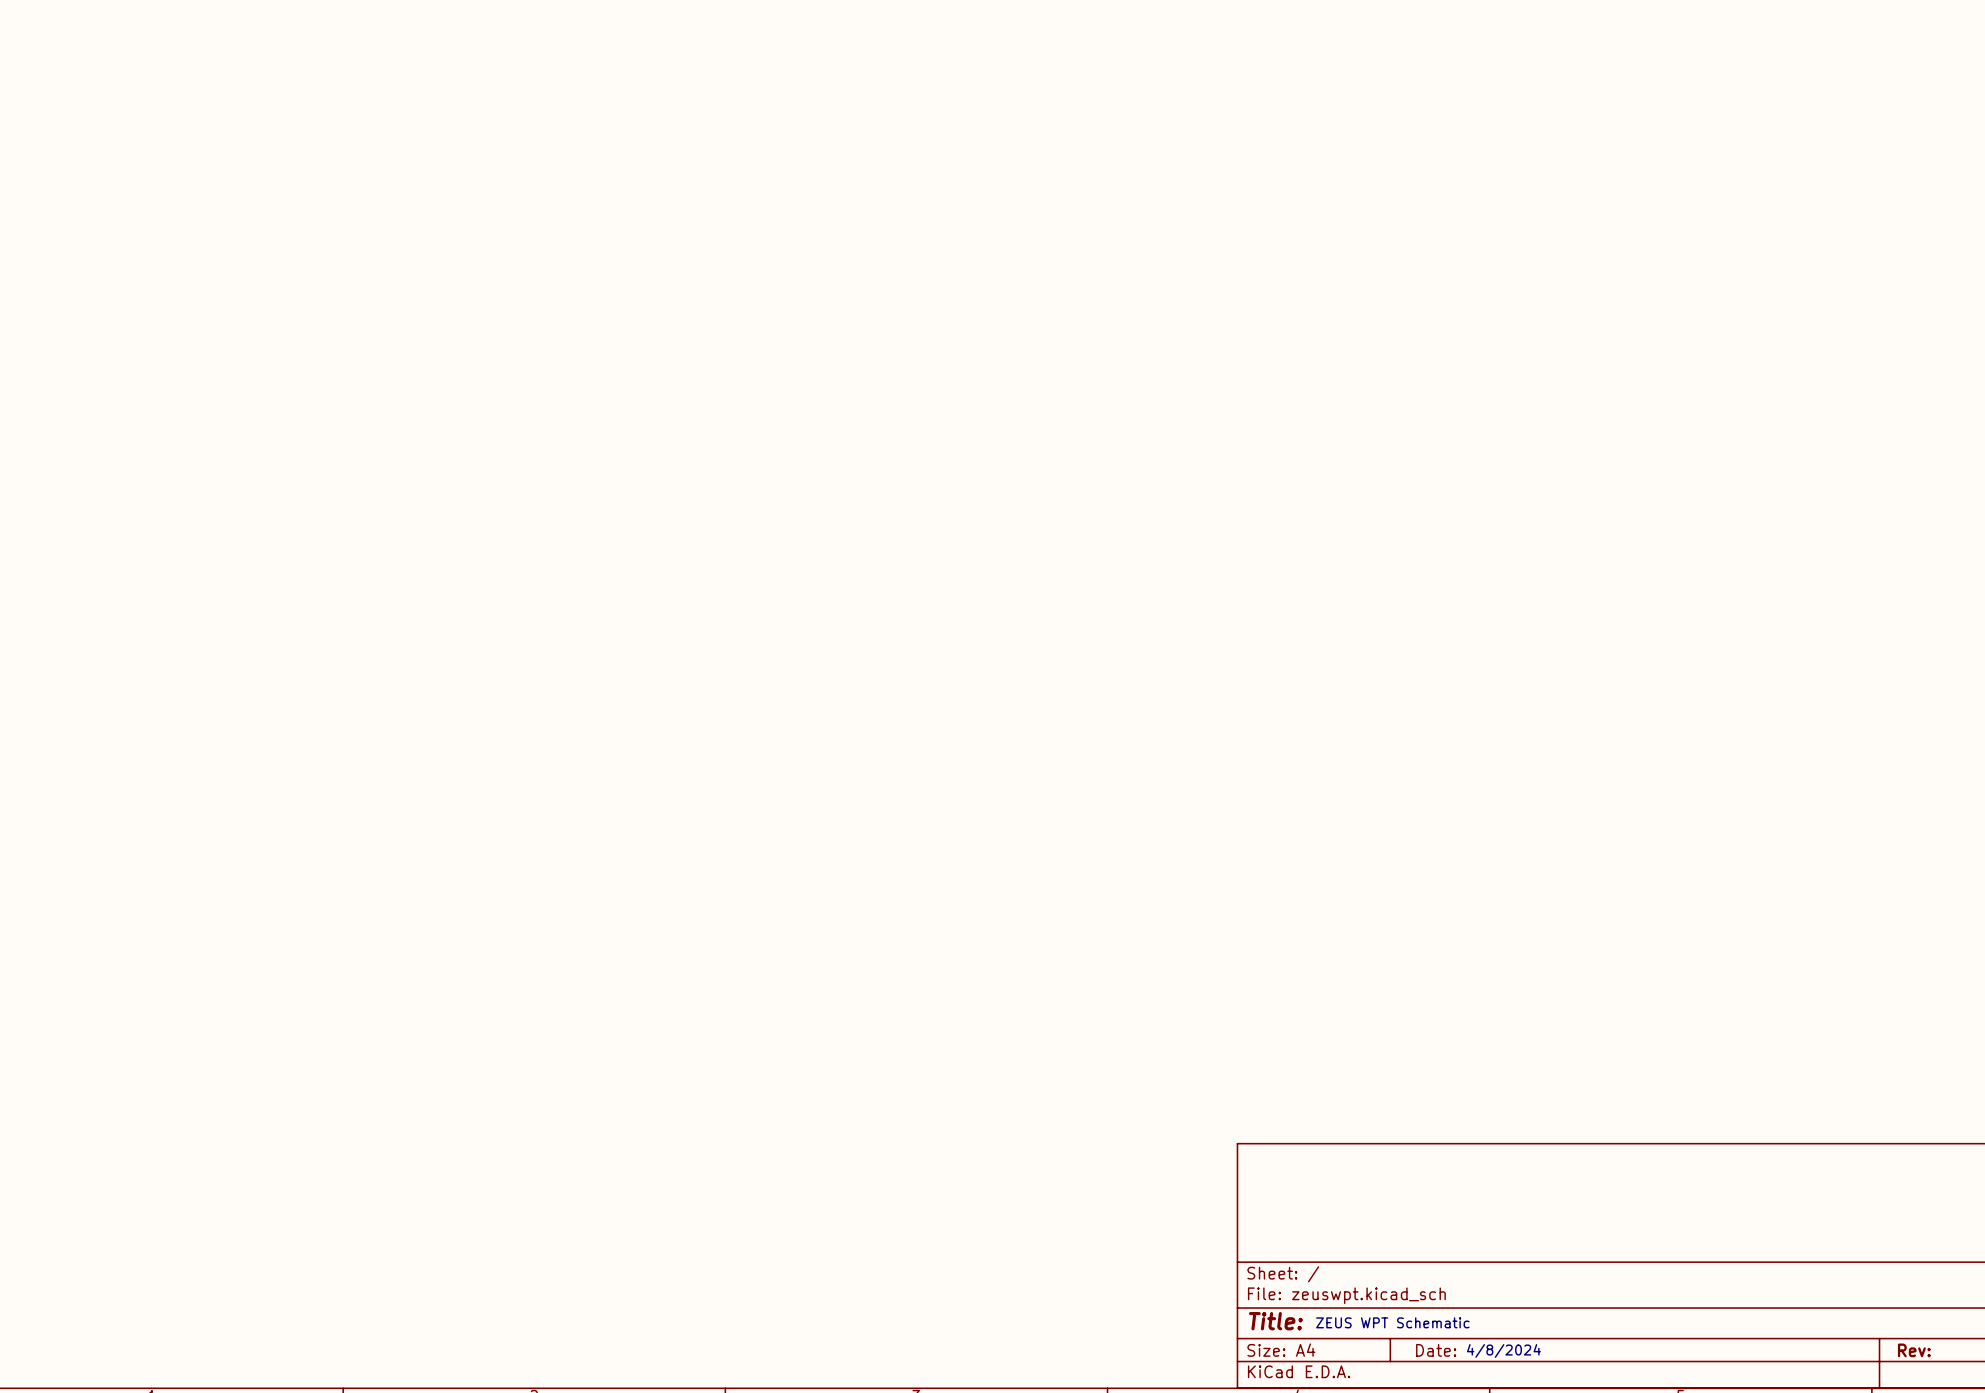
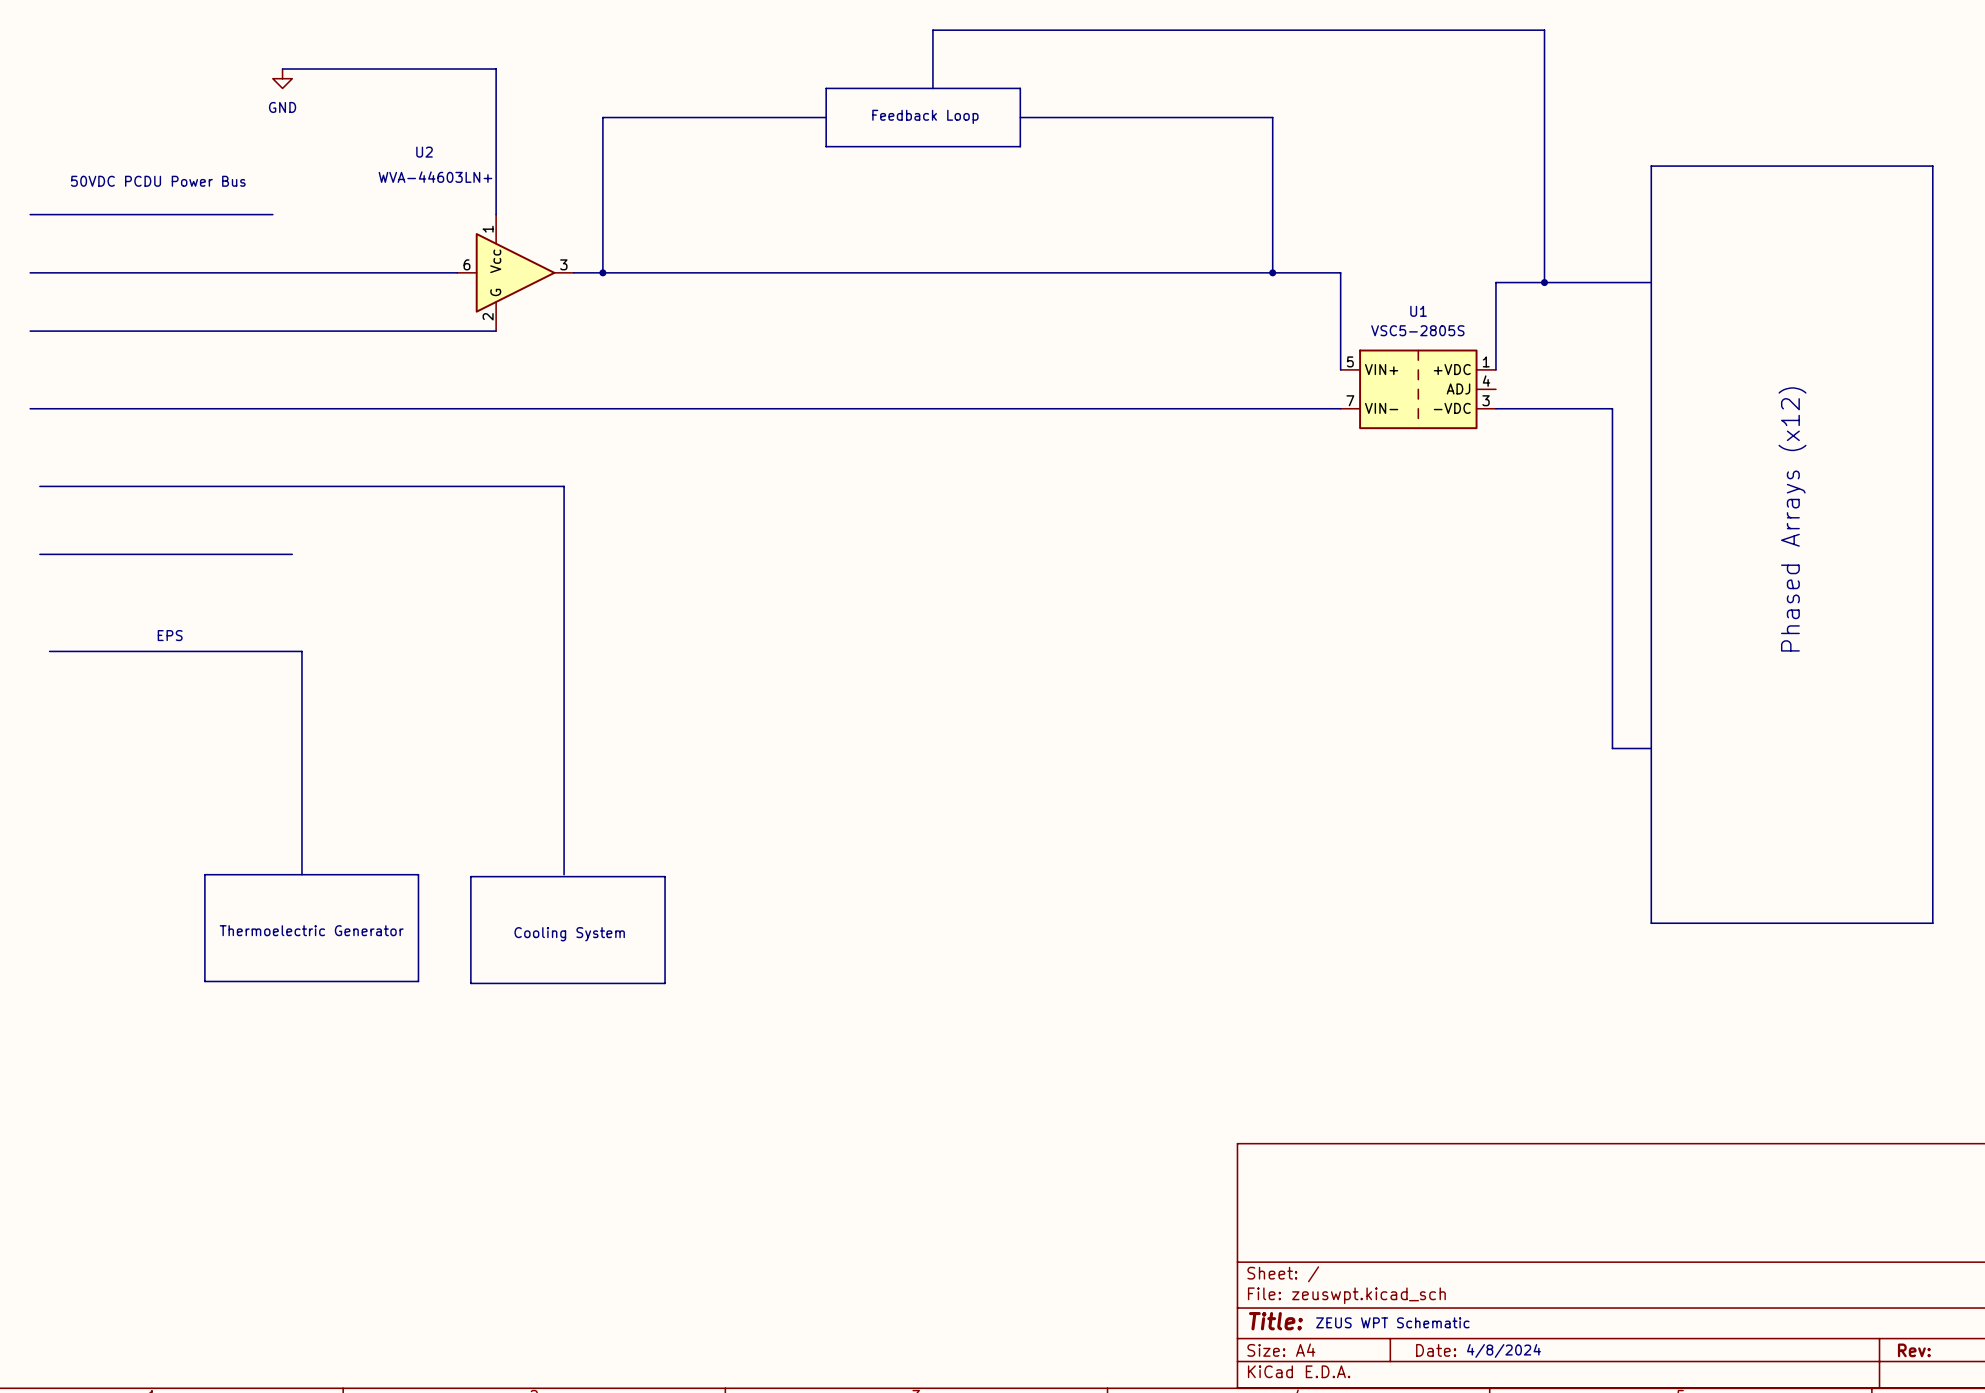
wire: none -> (282, 69) (496, 69) (496, 214)
power symbol: none -> GND (282, 78)
line: none -> (826, 88) (1020, 88) (1020, 146) (826, 146) (826, 88)
wire: none -> (932, 88) (932, 30) (1544, 30) (1544, 282)
text: none -> Feedback Loop (925, 116)
wire: none -> (826, 117) (602, 117) (602, 272)
wire: none -> (1020, 117) (1272, 117) (1272, 272)
line: none -> (1651, 166) (1932, 166) (1932, 923) (1651, 923) (1651, 166)
text: none -> 50VDC PCDU Power Bus (158, 181)
bus: none -> (30, 214) (272, 214)
wire: none -> (30, 272) (457, 272)
U2: none -> WVA-44603LN+ (515, 272)
wire: none -> (573, 272) (1340, 272) (1340, 369)
junction: none -> (602, 272)
junction: none -> (1272, 272)
junction: none -> (1544, 282)
wire: none -> (1651, 282) (1495, 282) (1495, 369)
wire: none -> (30, 331) (496, 331)
U1: none -> VSC5-2805S (1418, 389)
wire: none -> (30, 408) (1340, 408)
wire: none -> (1495, 408) (1612, 408) (1612, 748) (1651, 748)
wire: none -> (39, 486) (564, 486) (564, 874)
text: none -> Phased Arrays (x12) (1792, 519)
bus: none -> (39, 554) (292, 554)
text: none -> EPS (170, 635)
wire: none -> (49, 651) (301, 651) (301, 874)
line: none -> (204, 874) (418, 874) (418, 981) (204, 981) (204, 874)
line: none -> (470, 876) (665, 876) (665, 983) (470, 983) (470, 876)
text: none -> Thermoelectric Generator (311, 930)
text: none -> Cooling System (569, 934)

